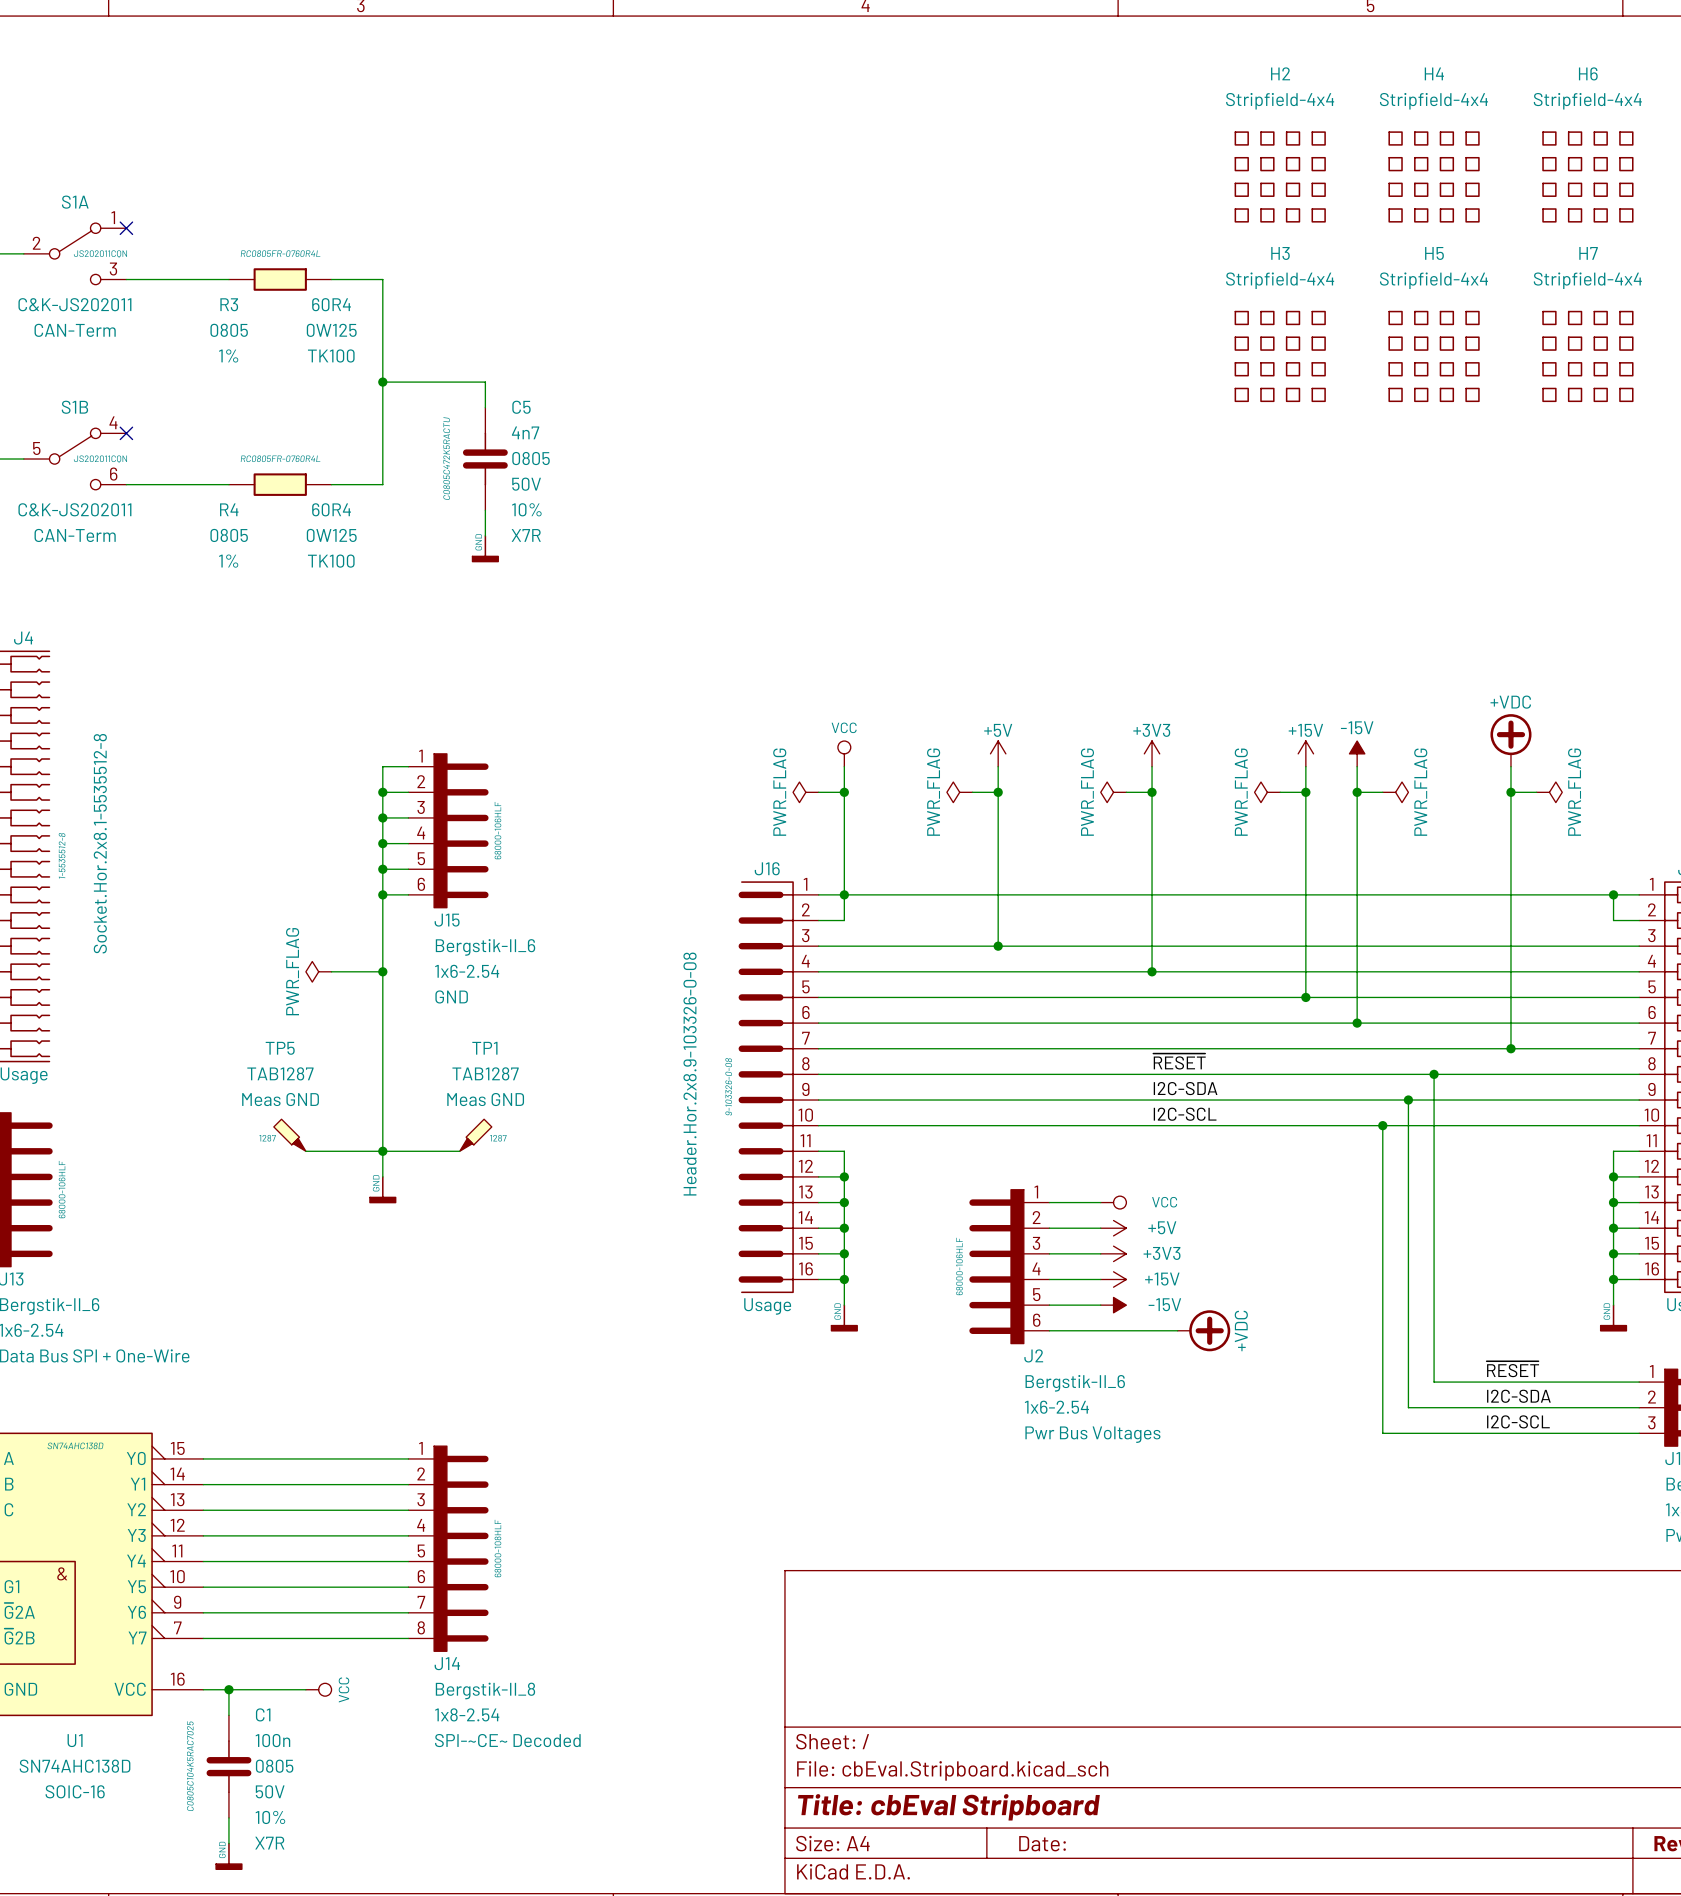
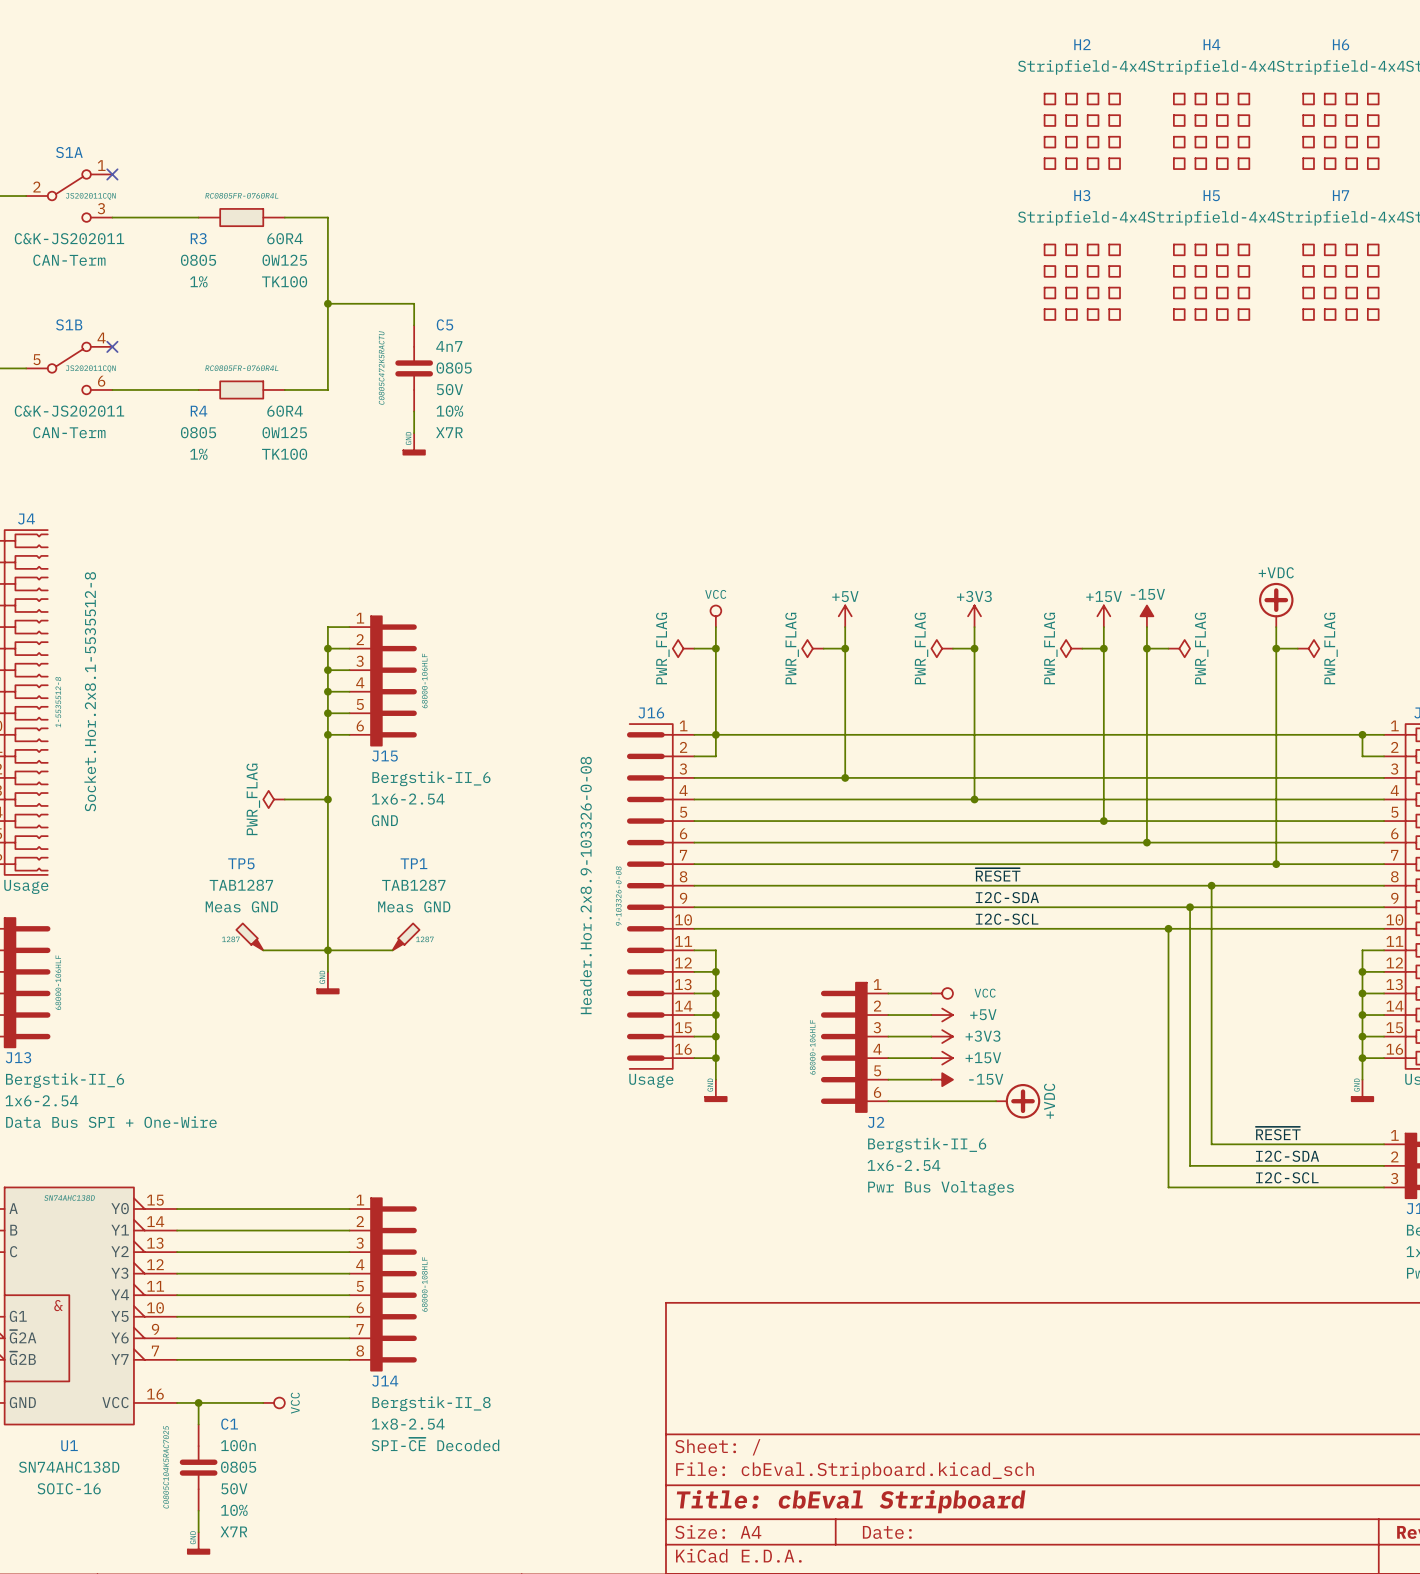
J14 text: SPI-~CE~ Decoded (507, 1740) -> SPI-~{CE} Decoded (435, 1444)

